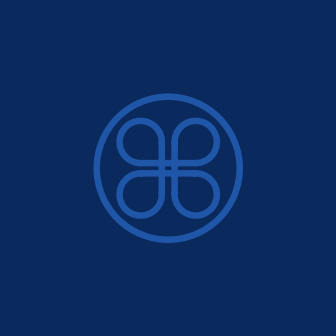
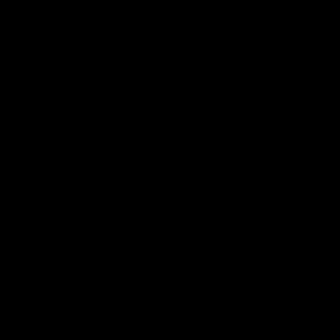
drawing: [93, 93, 243, 243] -> none

